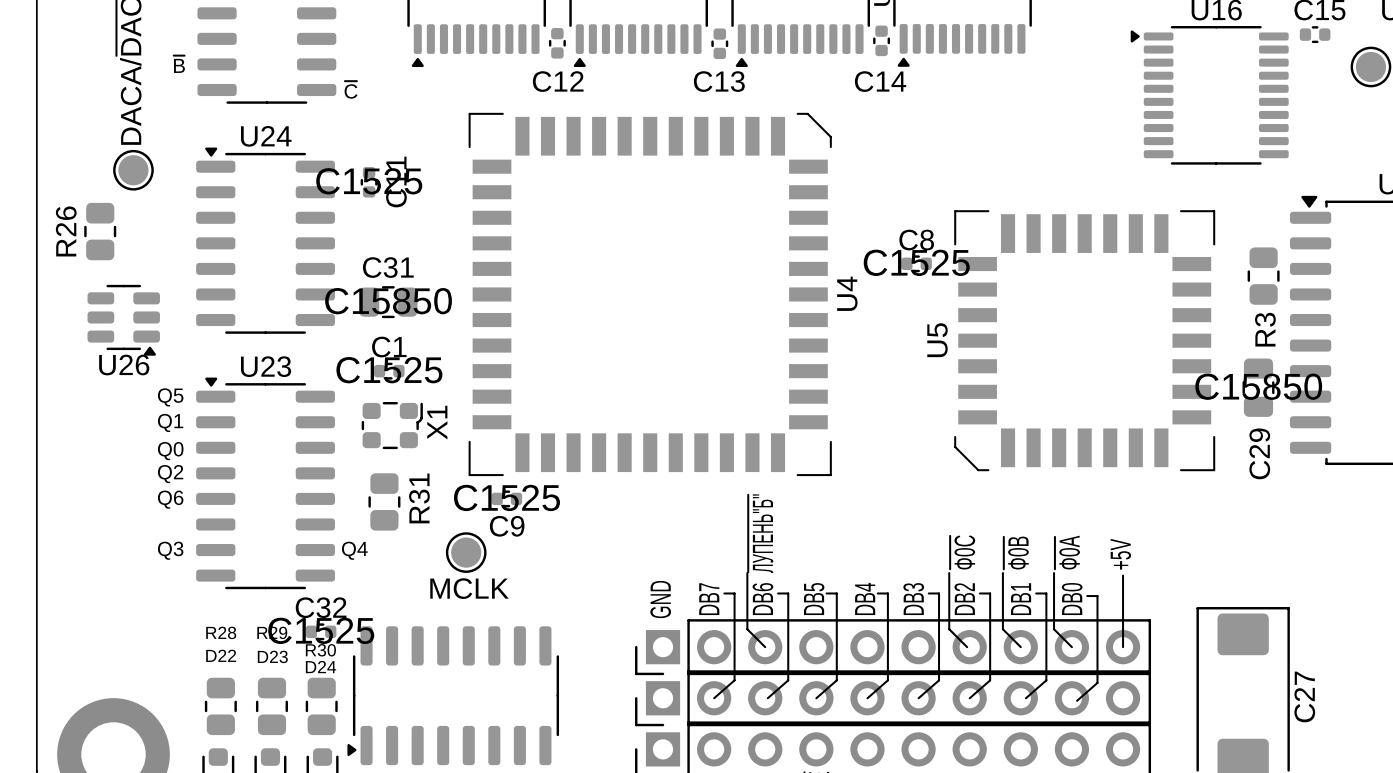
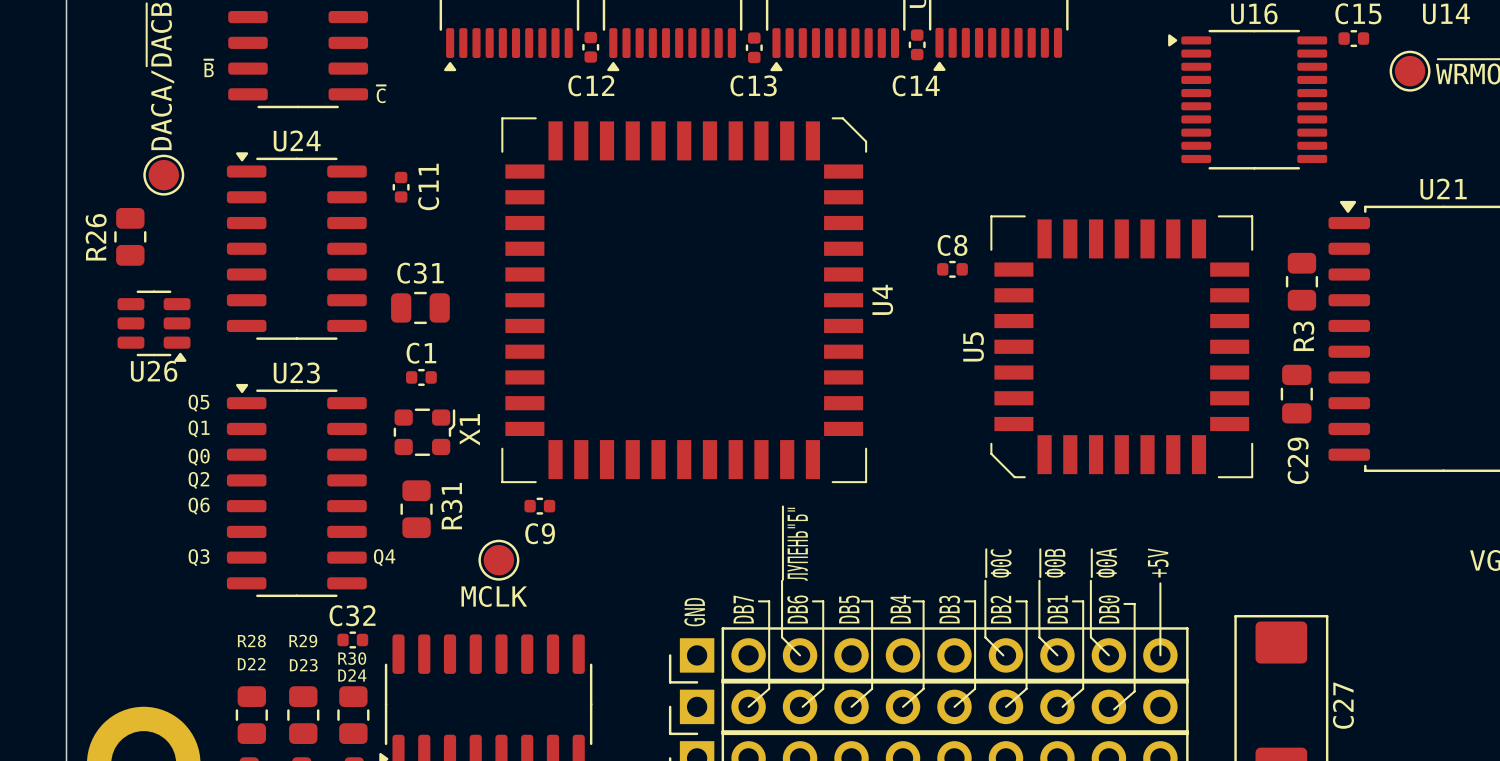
C11 text: C1525 (369, 181) -> none
C8 text: C1525 (916, 262) -> none
C31 text: C15850 (388, 301) -> none
C1 text: C1525 (389, 370) -> none
C29 text: C15850 (1258, 386) -> none
C9 text: C1525 (507, 497) -> none
C32 text: C1525 (321, 630) -> none

